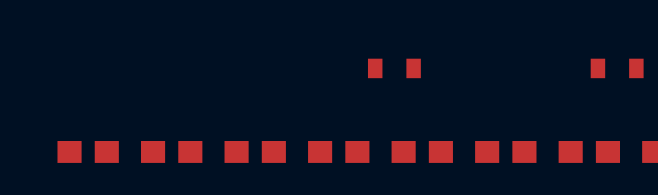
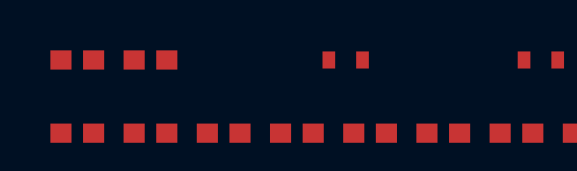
part: none -> (77, 59)
part: none -> (150, 59)

